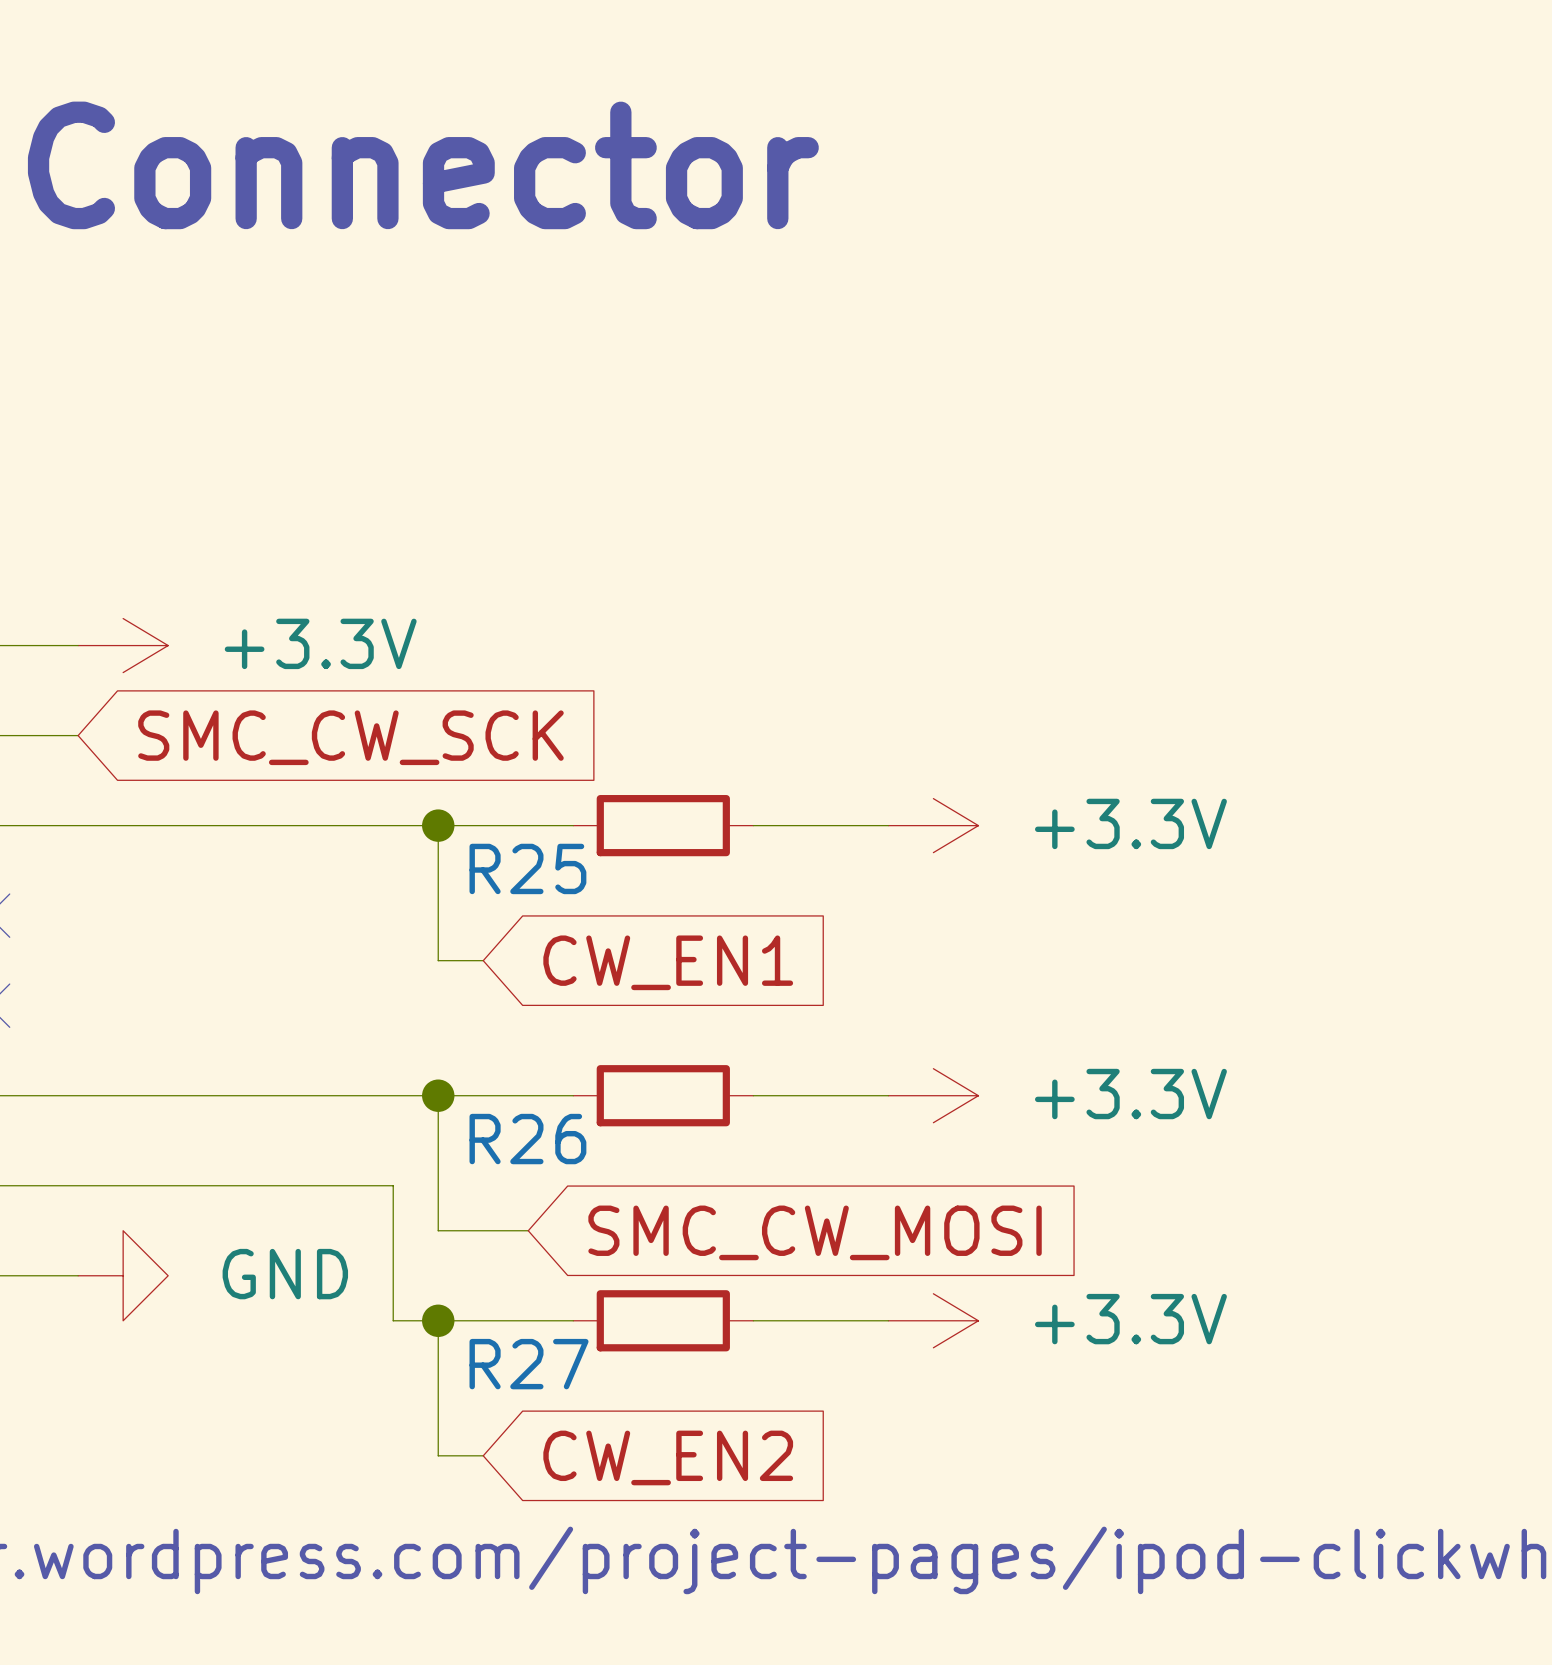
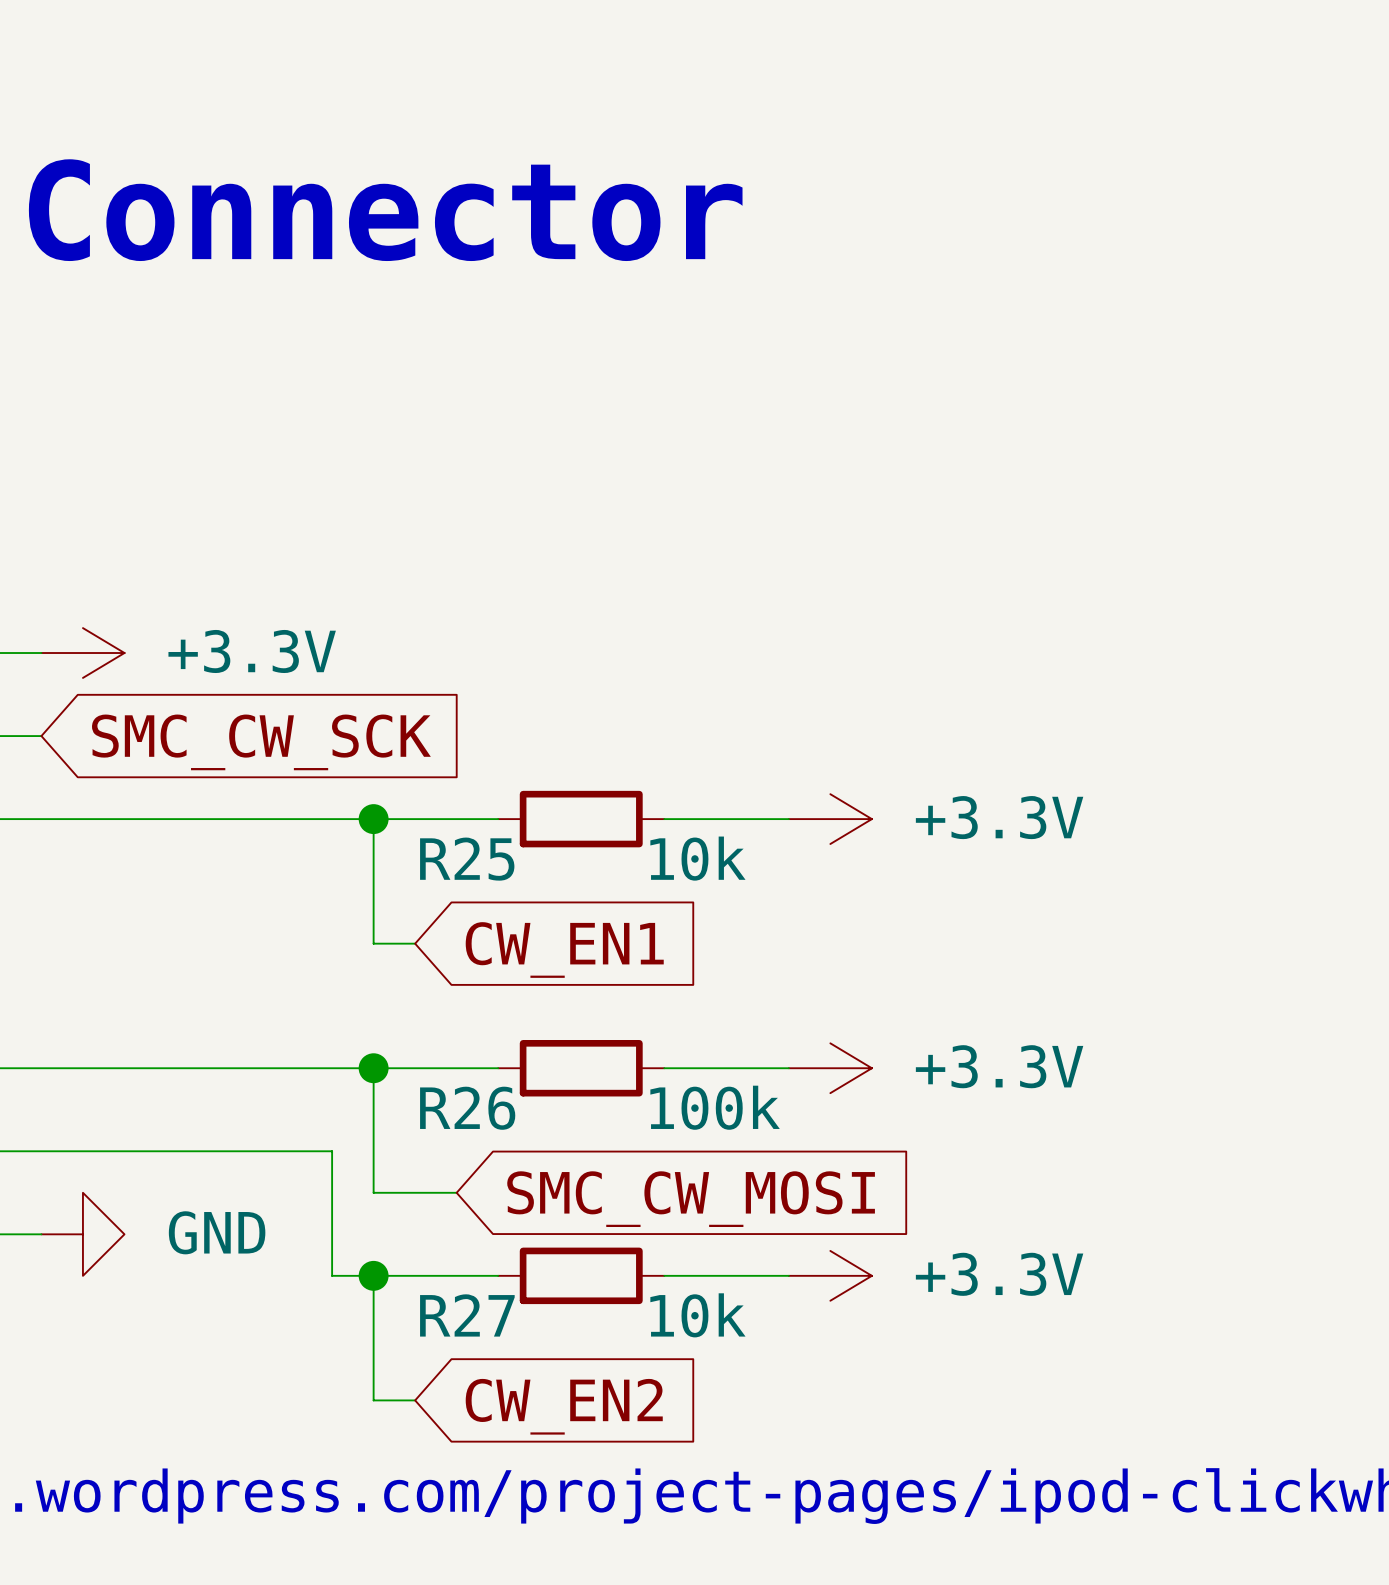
R25 value: none -> 10k (697, 858)
R26 value: none -> 100k (715, 1107)
R27 value: none -> 10k (697, 1315)

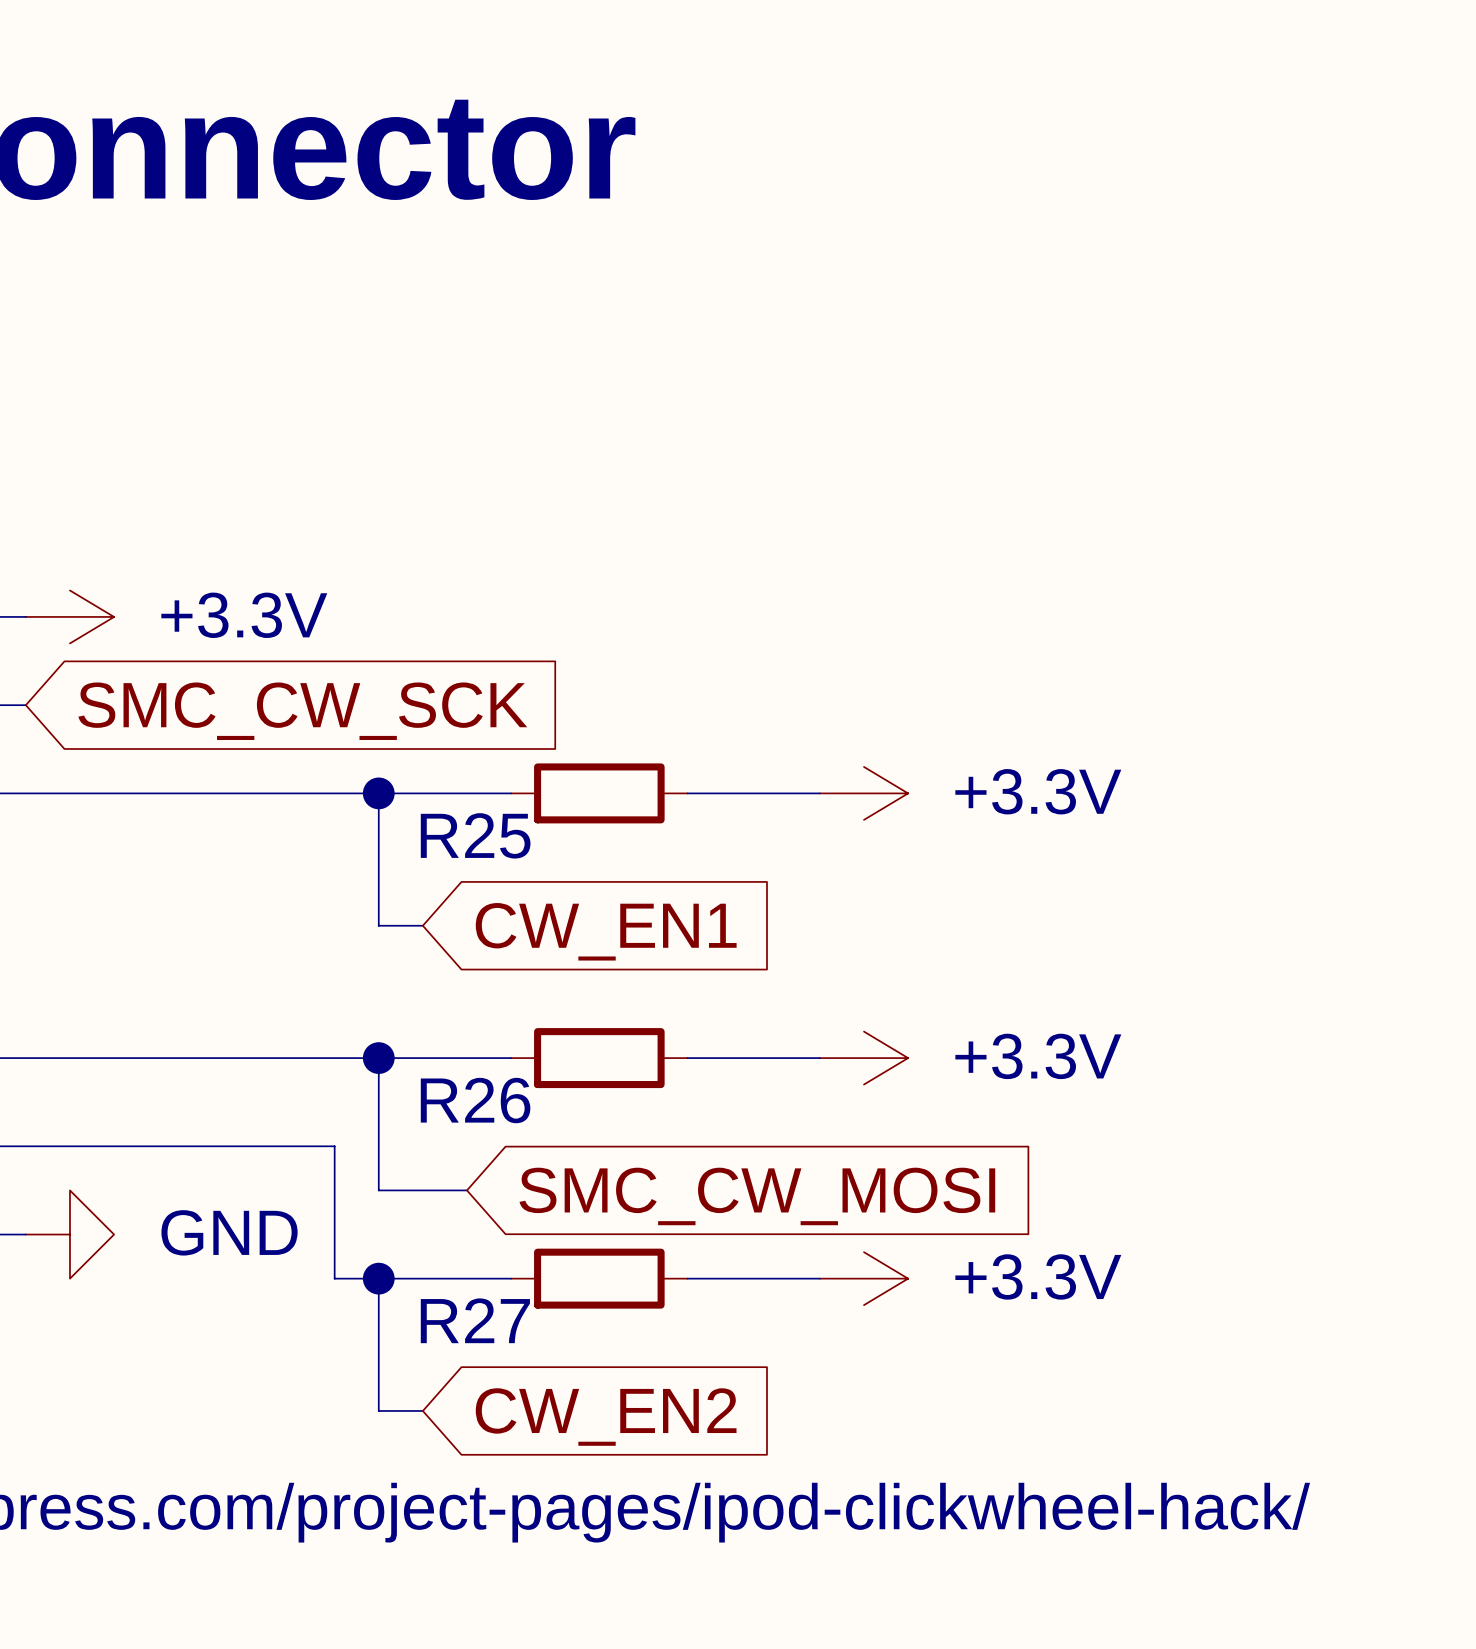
R25 value: 10k (697, 858) -> none
R26 value: 100k (715, 1107) -> none
R27 value: 10k (697, 1315) -> none

